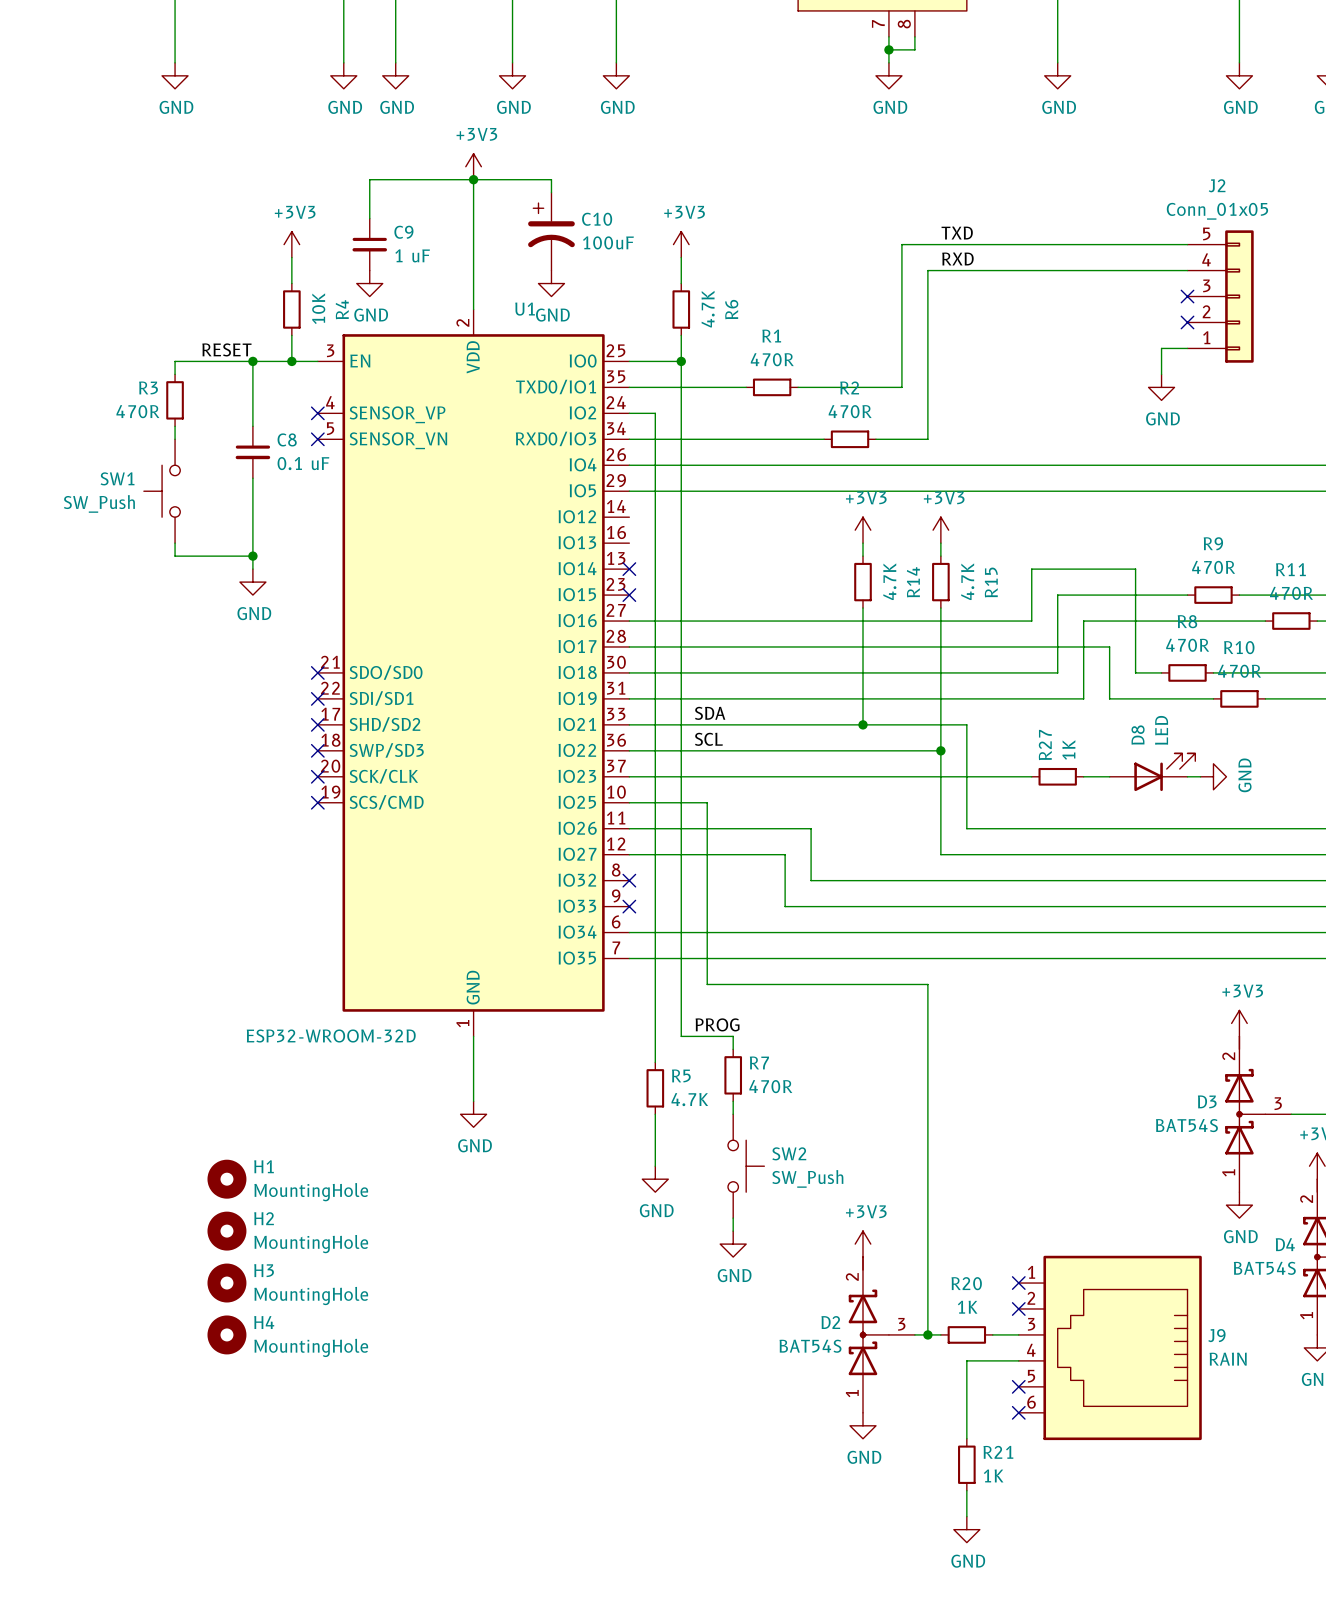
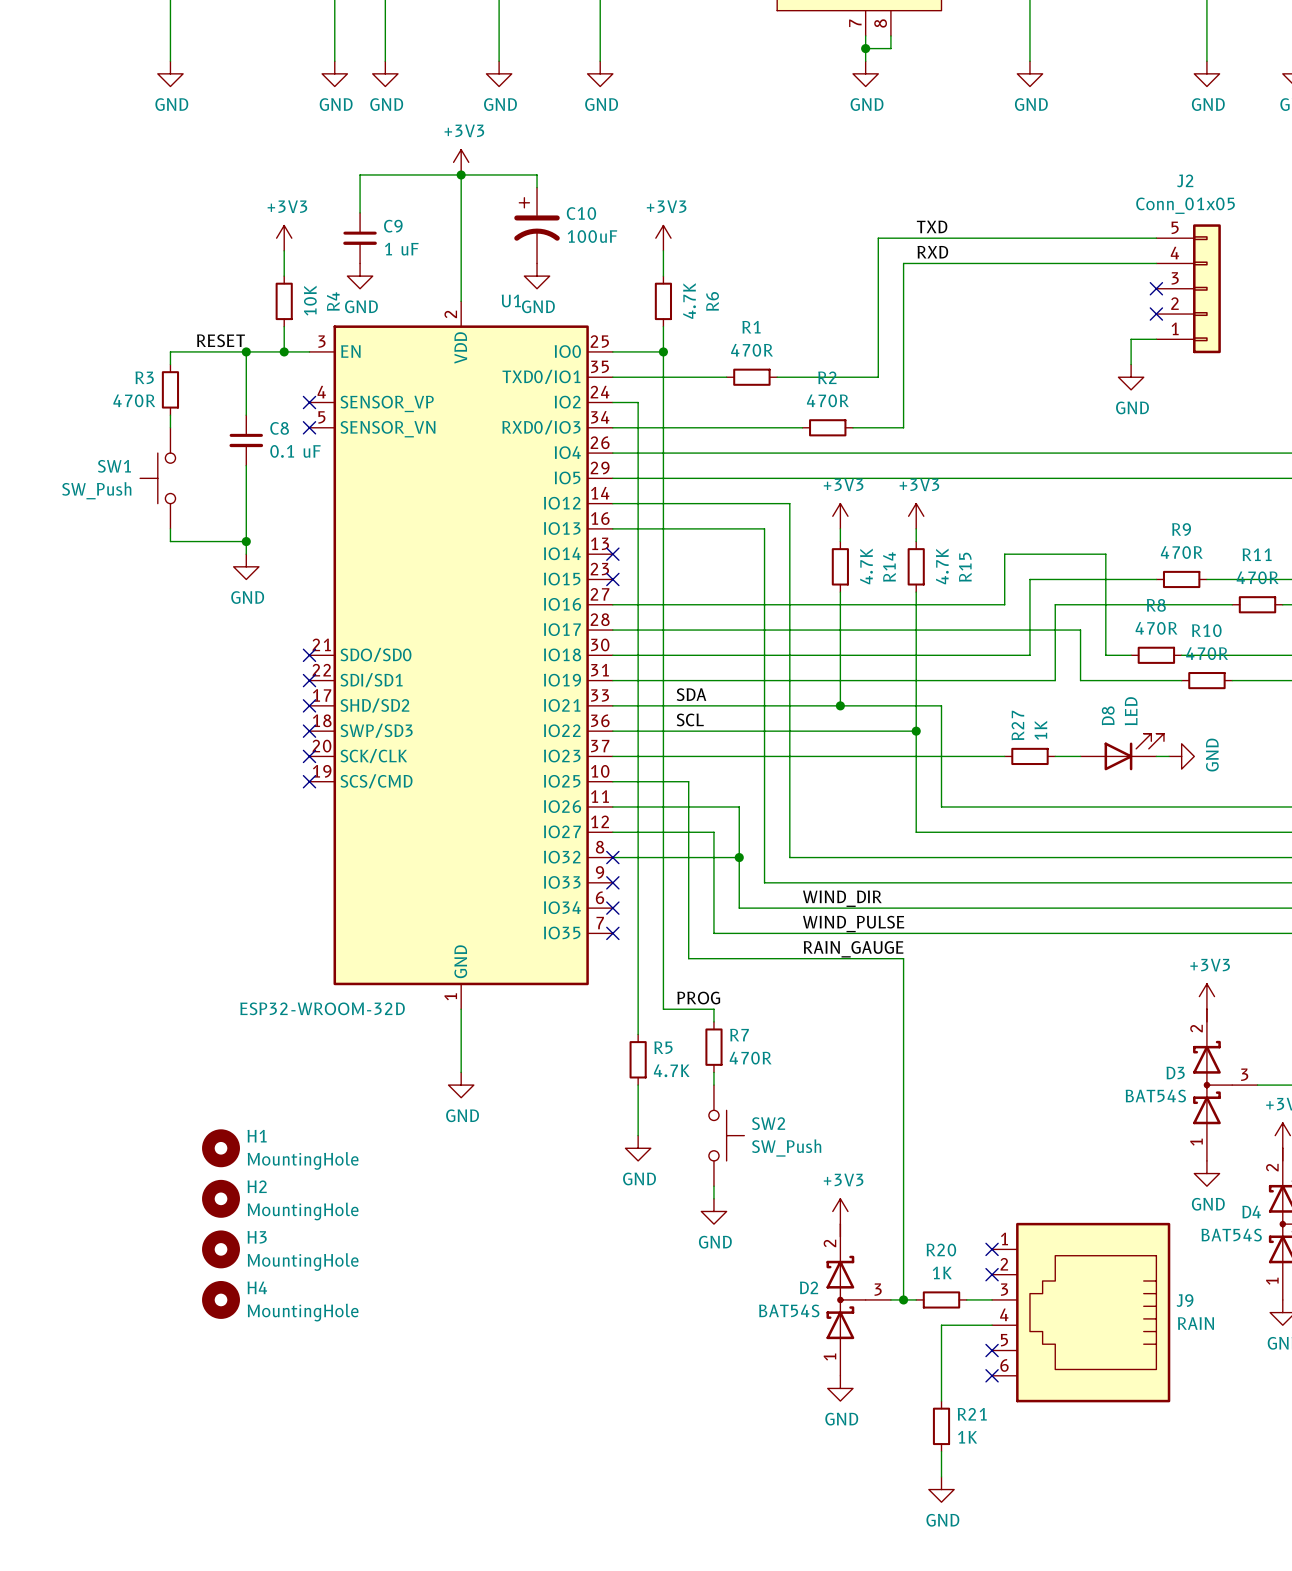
wire: none -> (612, 503) (789, 503) (789, 806)
wire: none -> (612, 528) (764, 528) (764, 832)
wire: (759, 828) (811, 828) -> (739, 806) (739, 908)
wire: (733, 854) (785, 854) -> (713, 832) (713, 933)
junction: none -> (739, 857)
label: none -> WIND_DIR (842, 898)
wire: (629, 932) (759, 932) -> (612, 857) (739, 857)
no-connect mark: none -> (612, 908)
label: none -> WIND_PULSE (853, 924)
wire: (629, 958) (733, 958) -> none
no-connect mark: none -> (612, 933)
label: none -> RAIN_GAUGE (853, 949)

